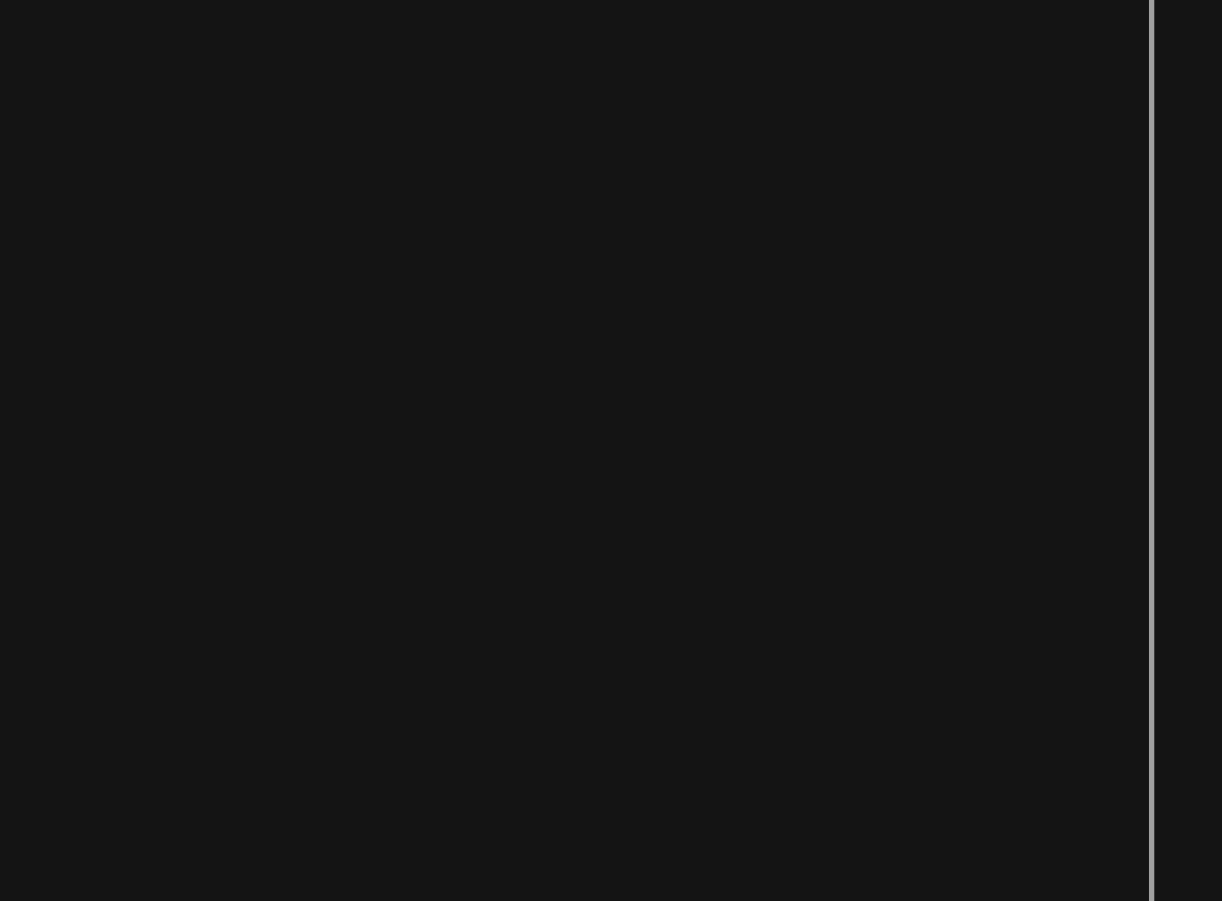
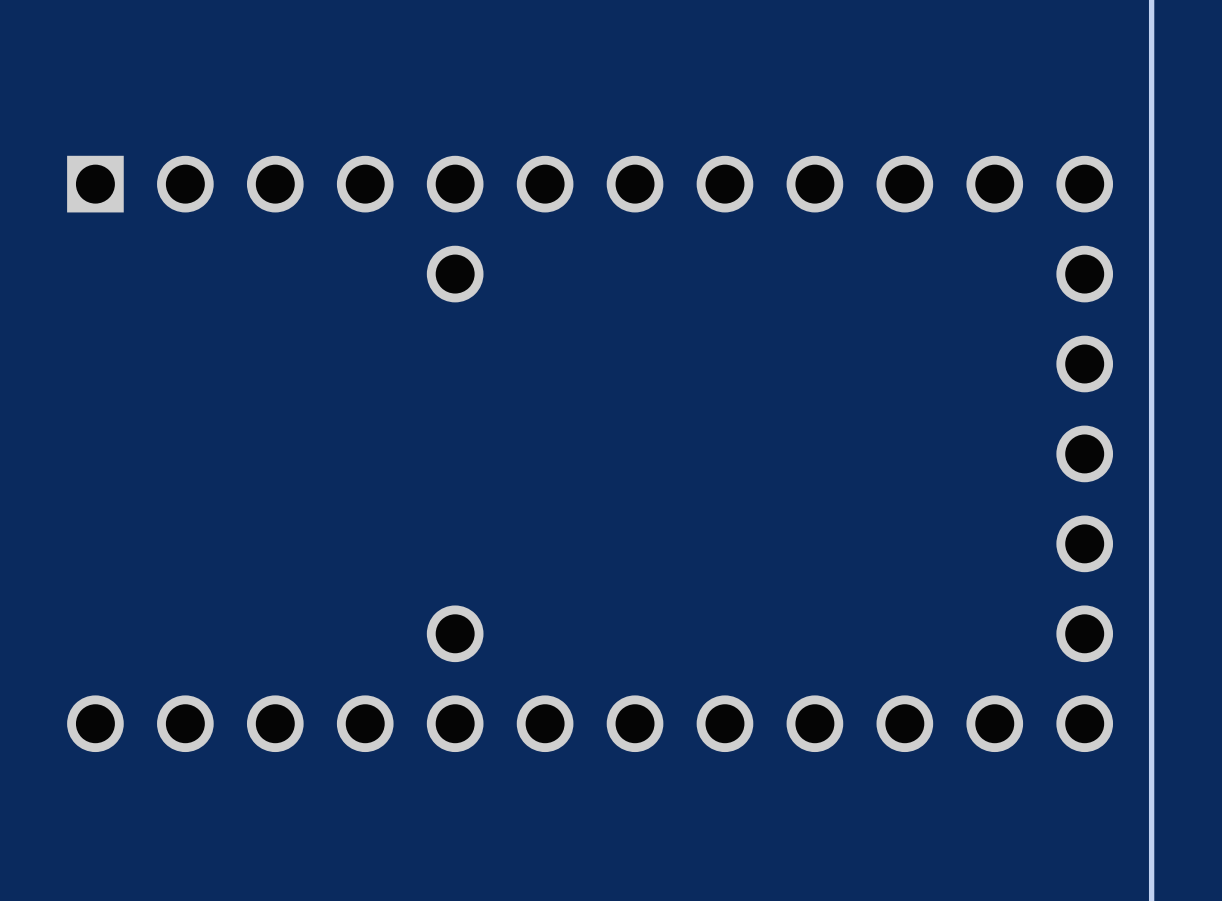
part: none -> (590, 453)

